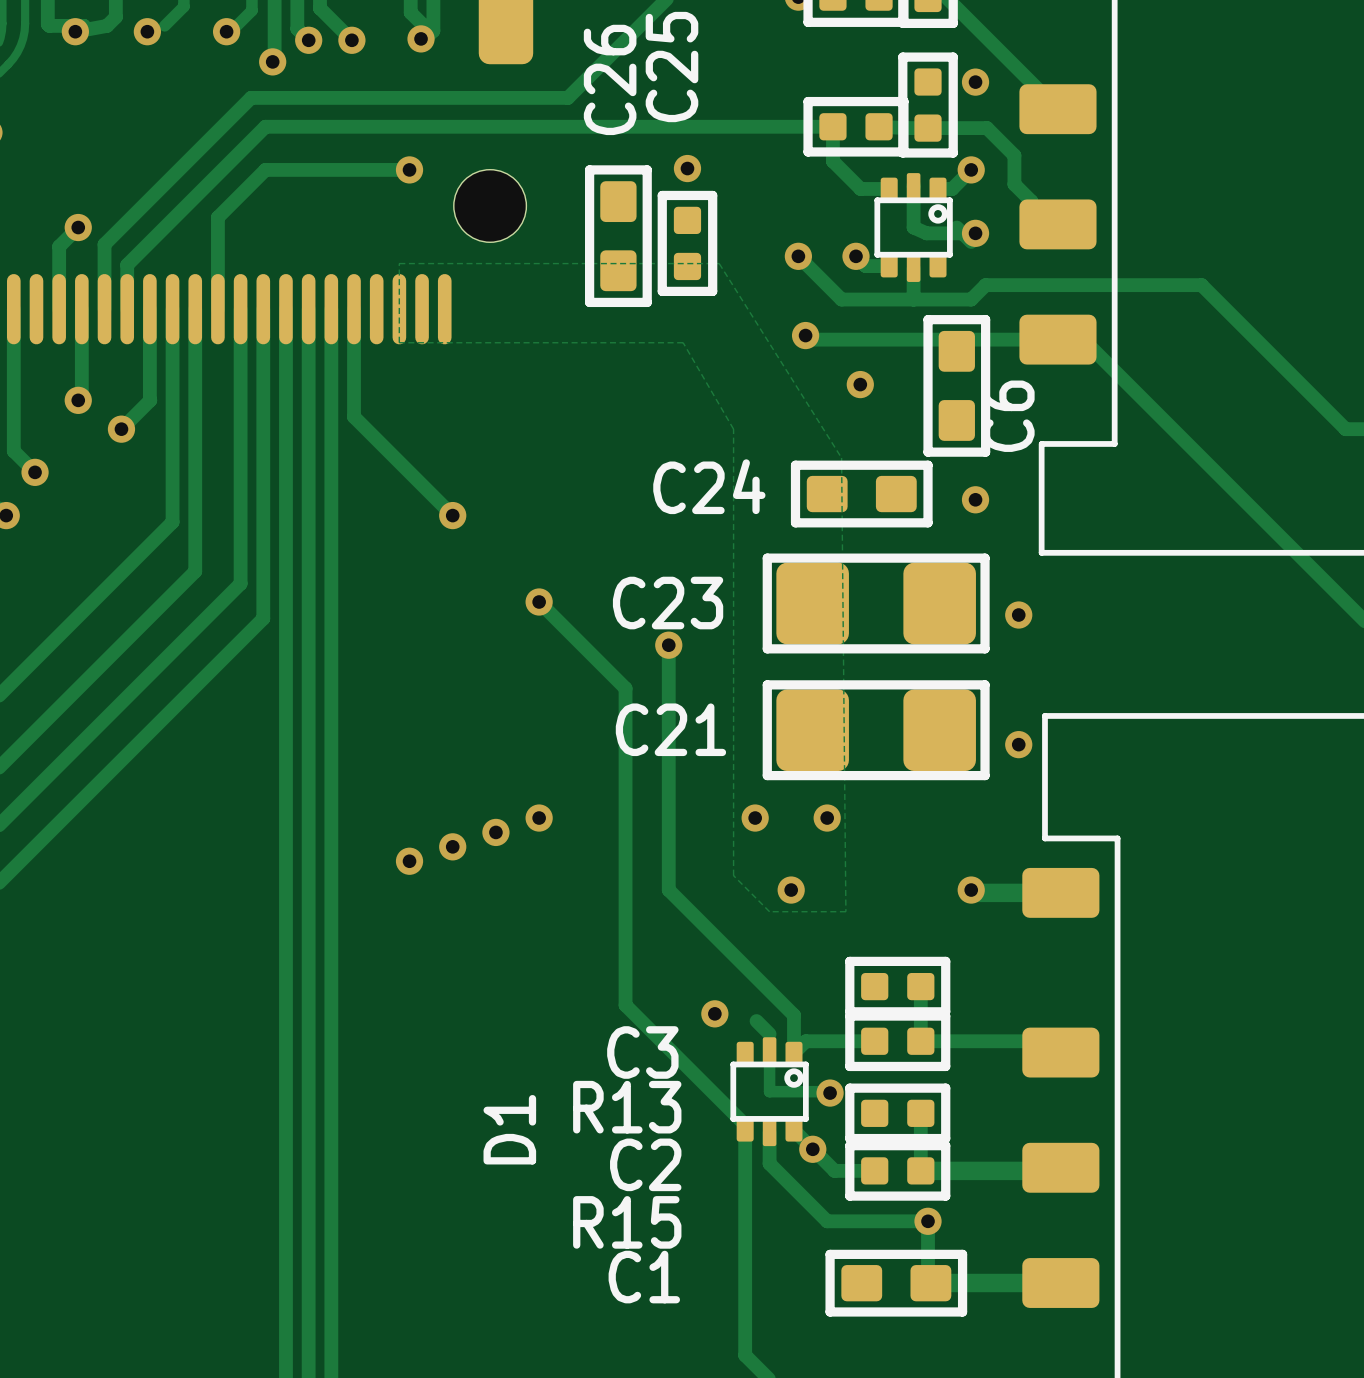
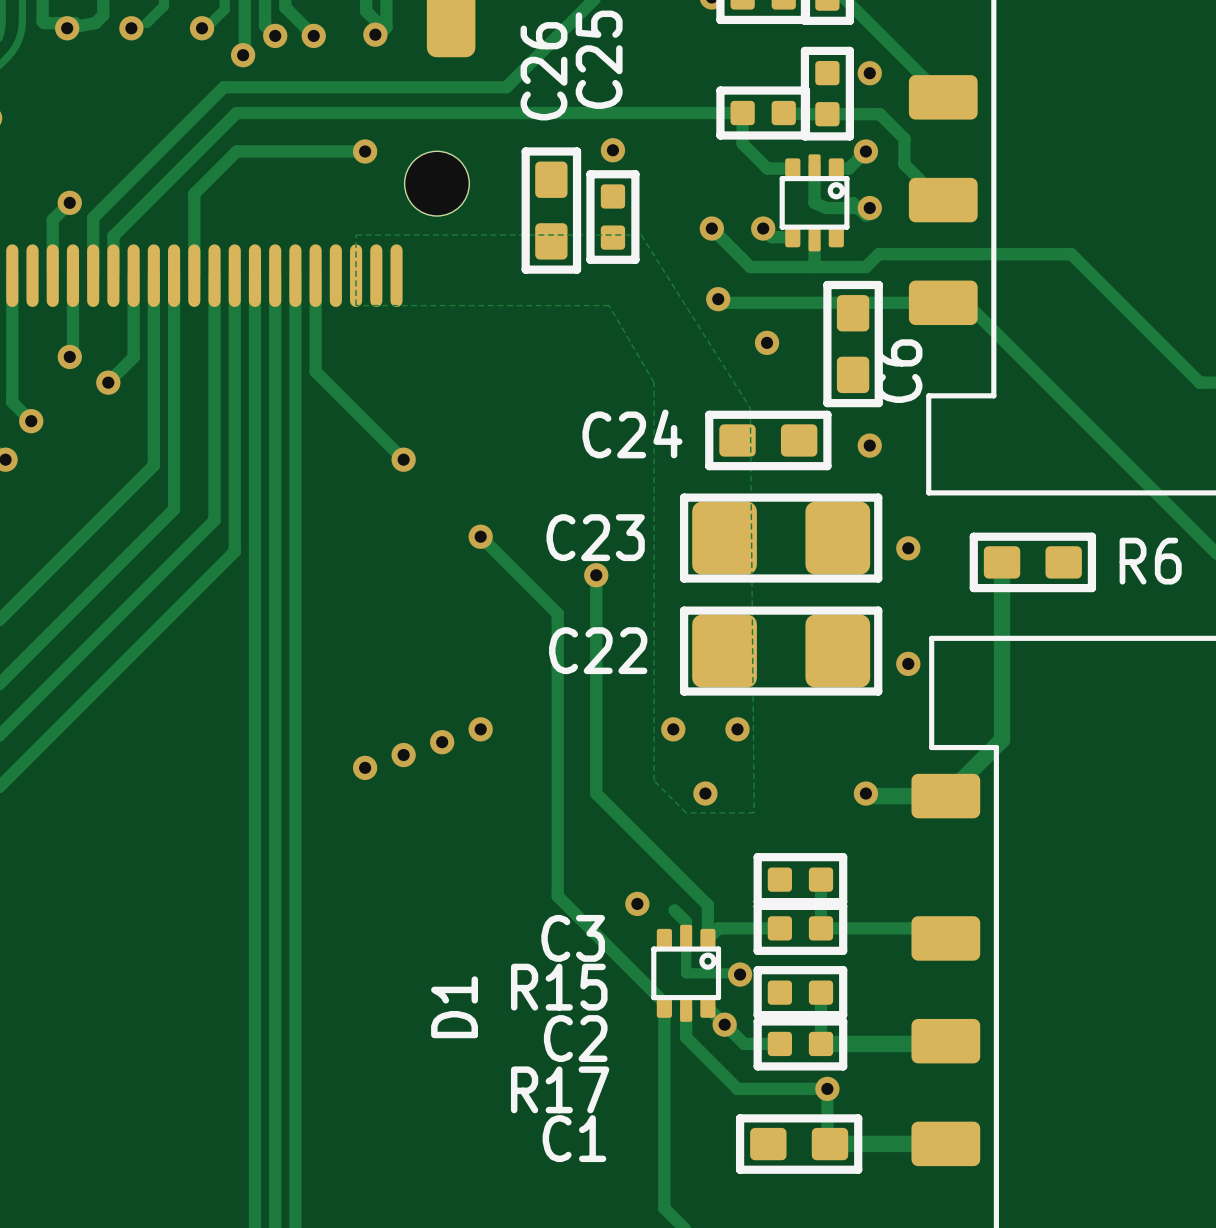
track: none -> (1002, 562) (1002, 739) (945, 796)
R6: none -> (1032, 562)
C21 name: C21 (670, 729) -> C22 (598, 650)
R13 name: R13 (627, 1107) -> R15 (559, 987)
R15 name: R15 (627, 1222) -> R17 (560, 1089)

